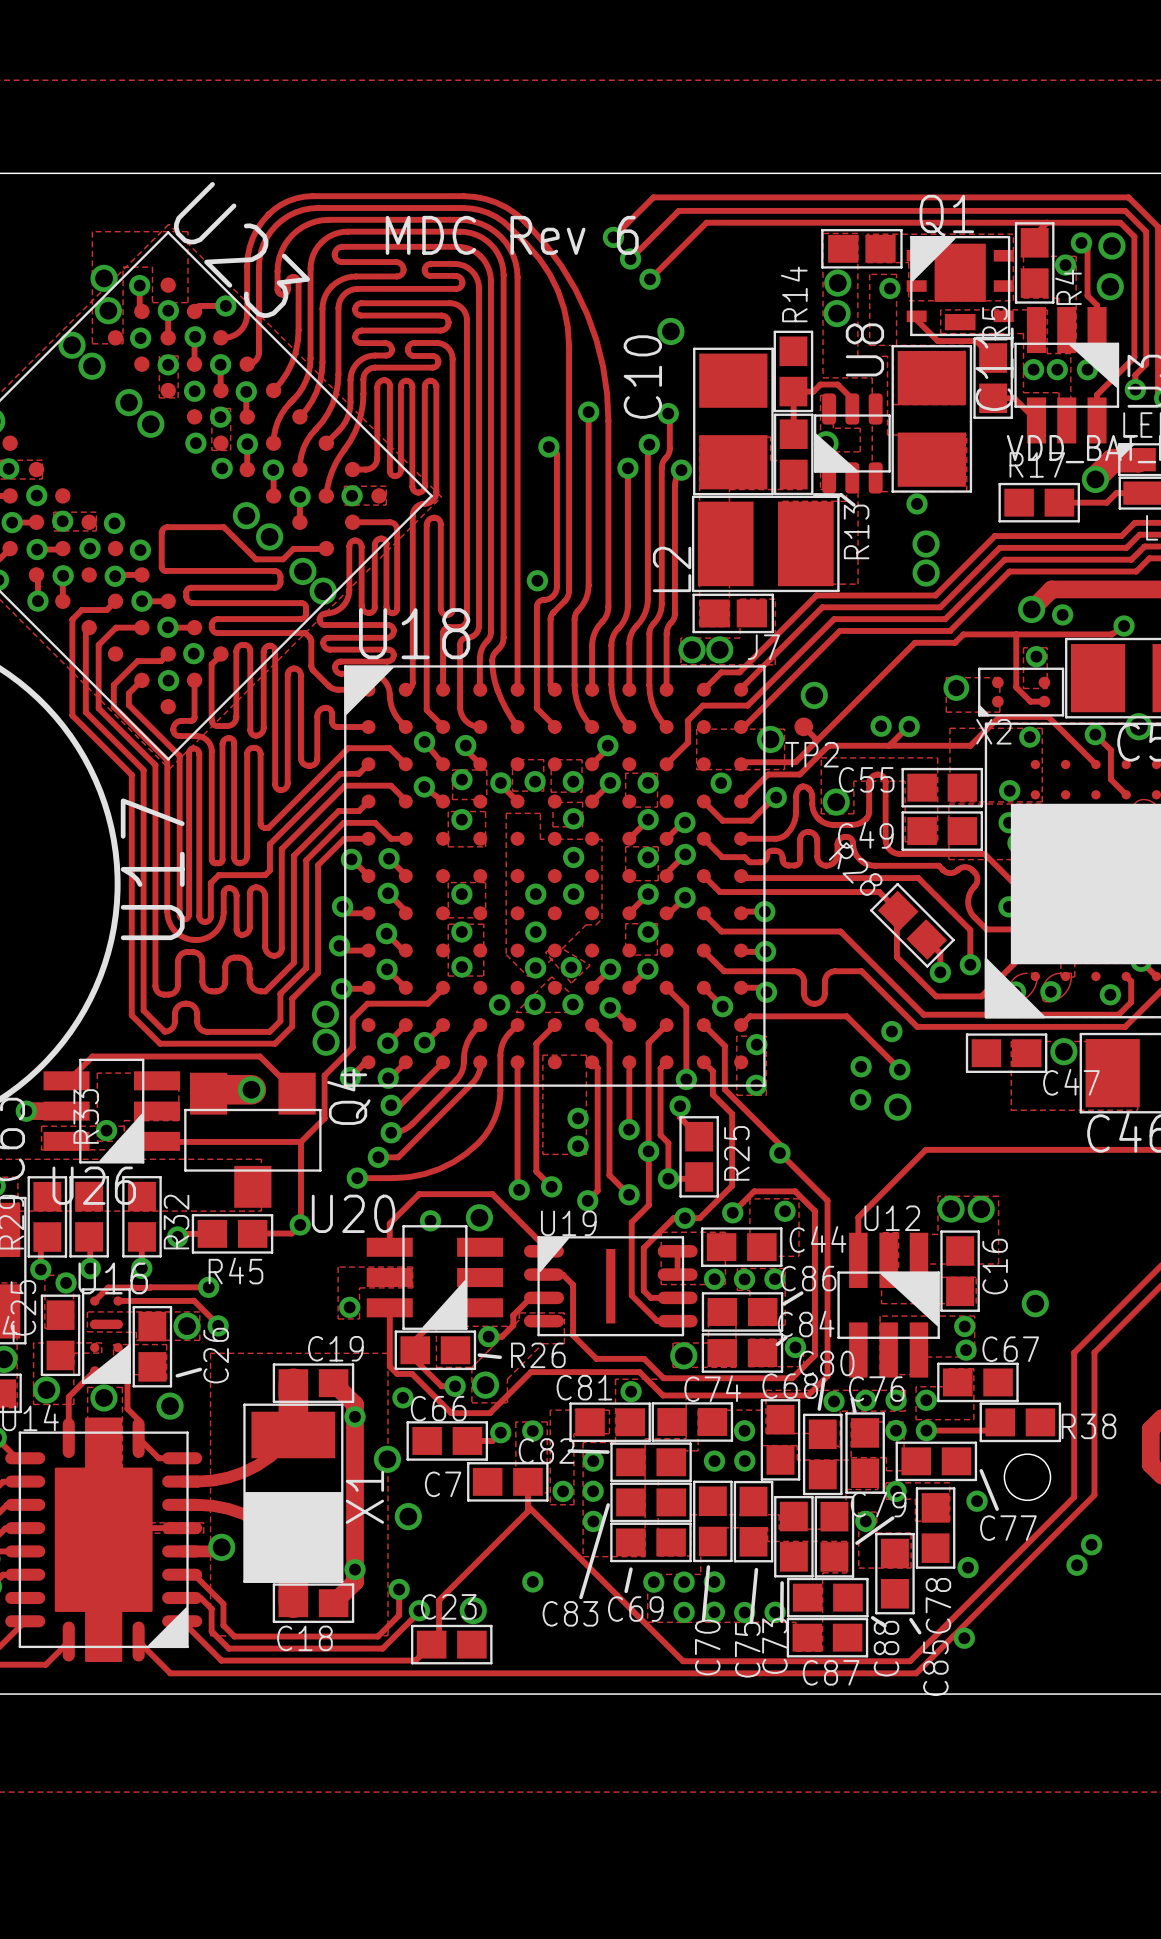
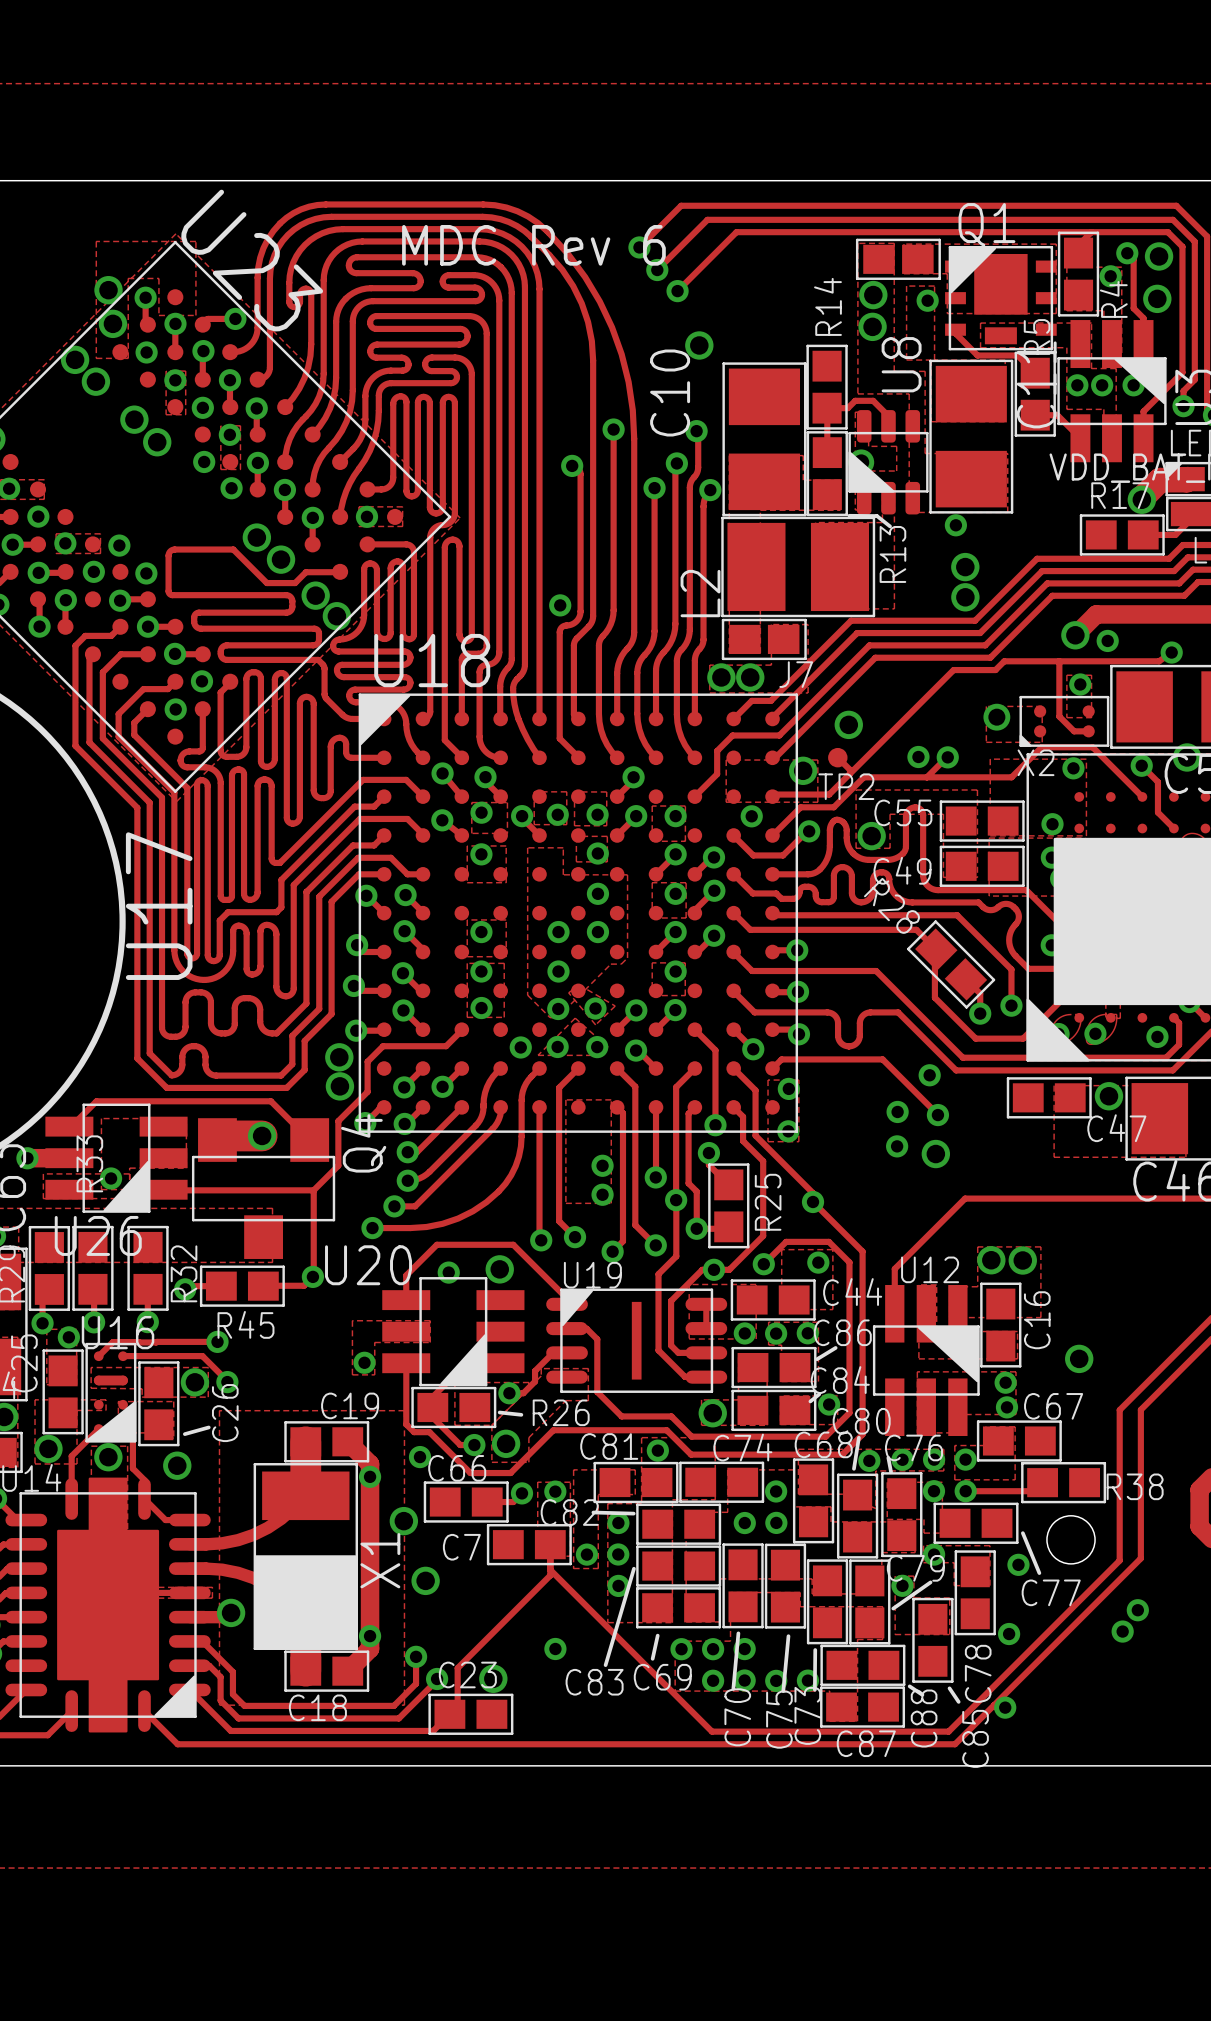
track: (1147, 493) (1116, 493) (1106, 502) (1059, 502) -> (1196, 514) (1175, 534) (1143, 534)
R17 position: (1039, 502) -> (1122, 534)

